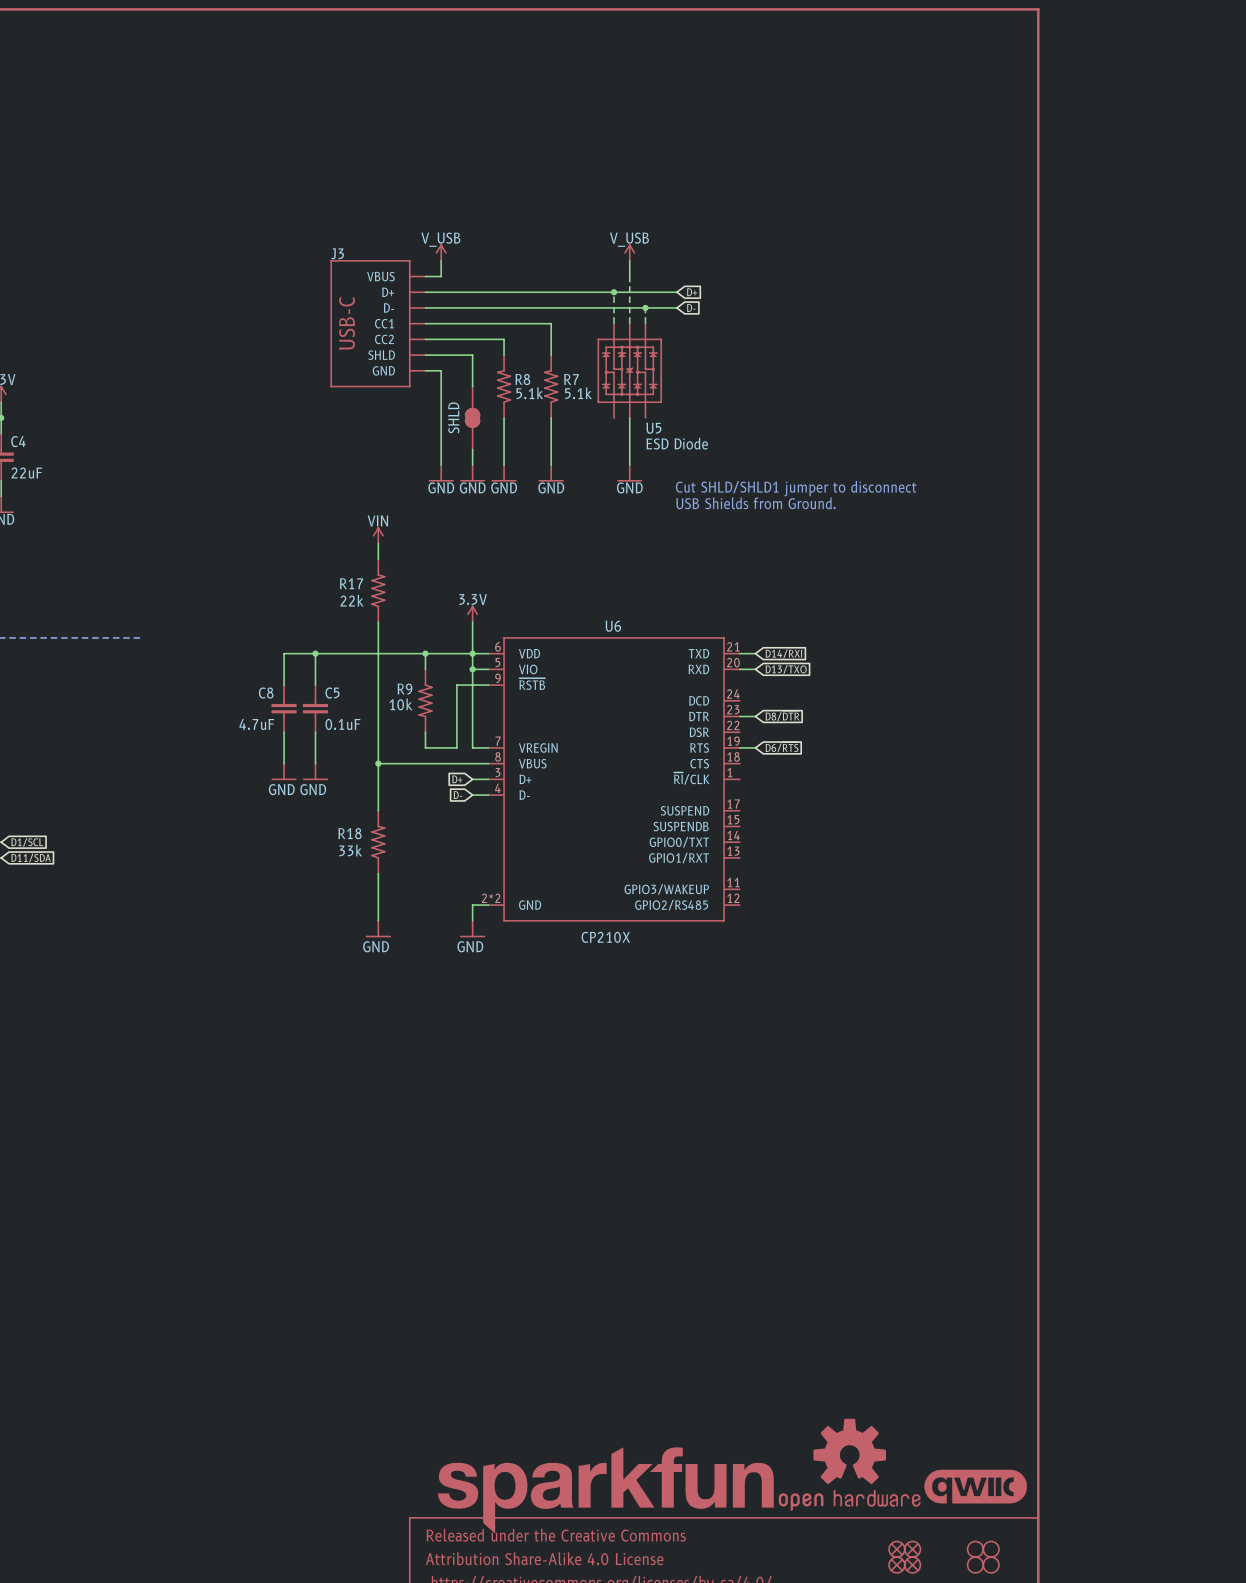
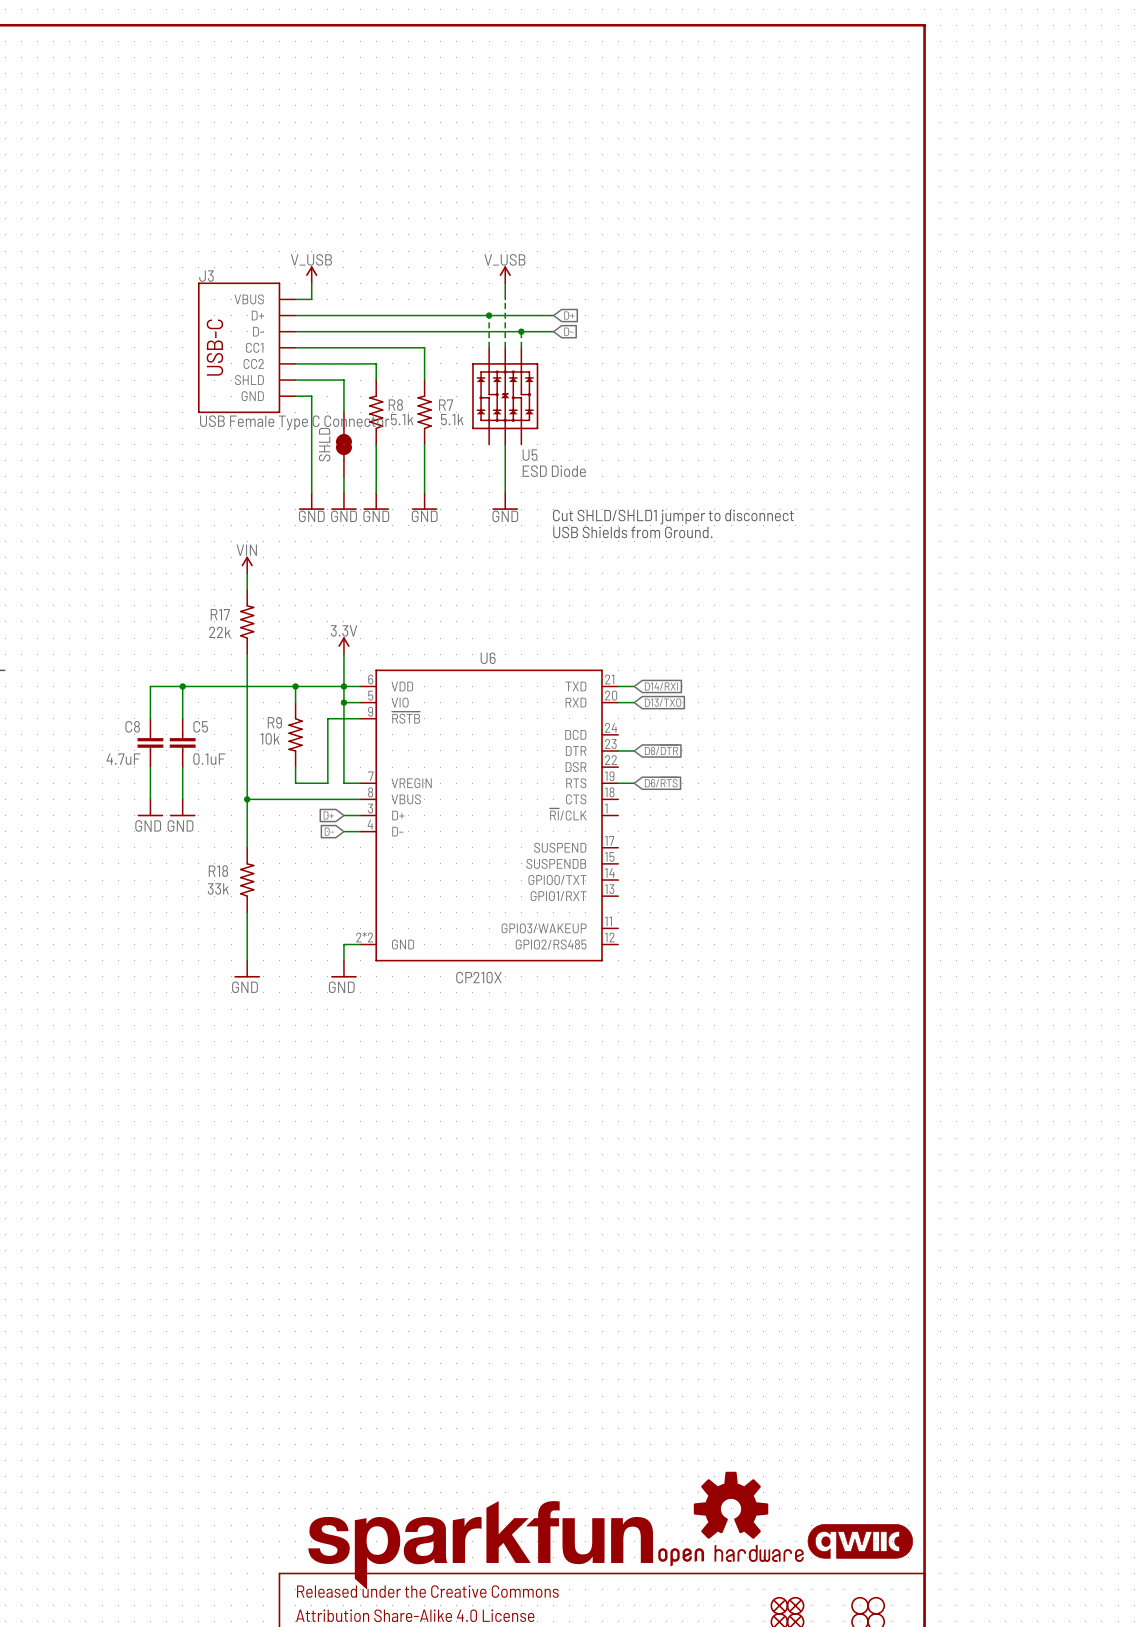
J3 value: none -> USB Female Type C Connector (294, 422)

